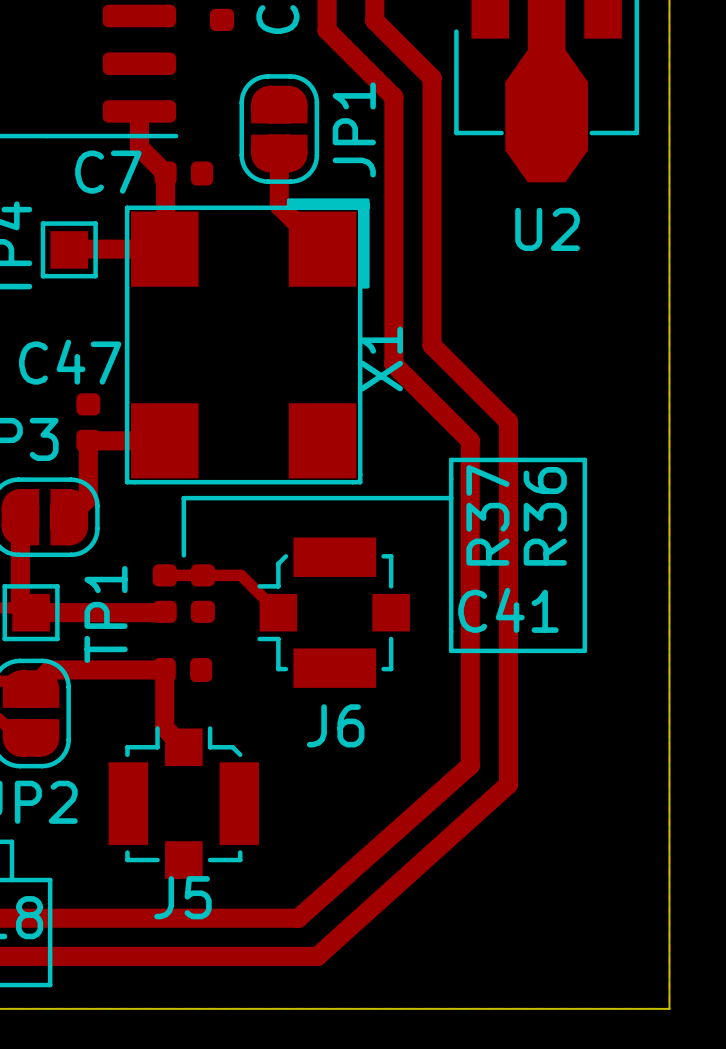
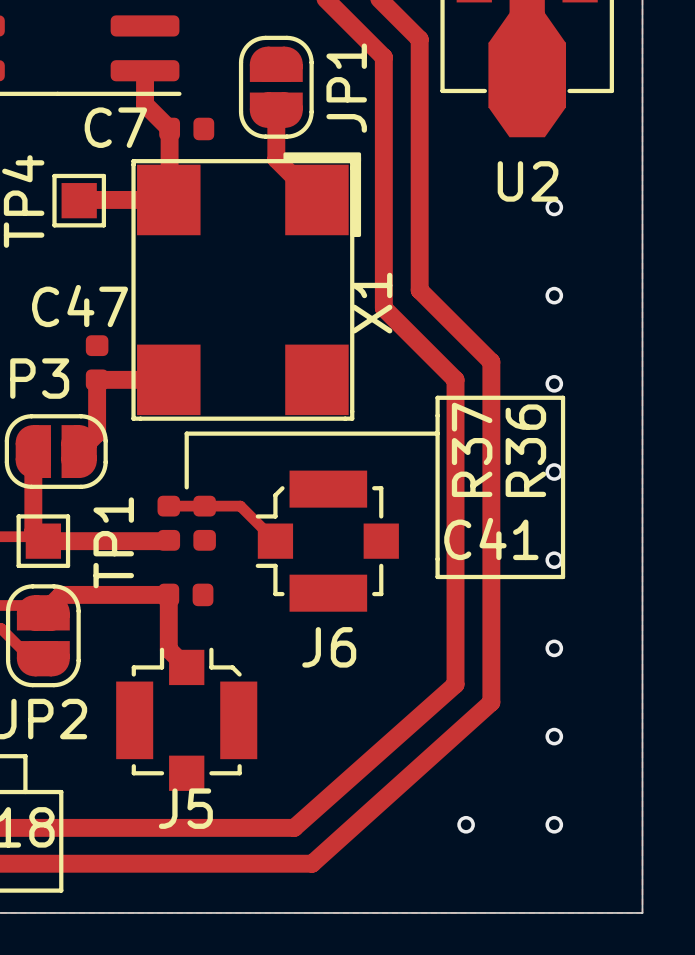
via: none -> (554, 207)
via: none -> (554, 295)
via: none -> (554, 383)
via: none -> (554, 472)
via: none -> (554, 560)
via: none -> (554, 648)
via: none -> (554, 736)
via: none -> (466, 824)
via: none -> (554, 824)

